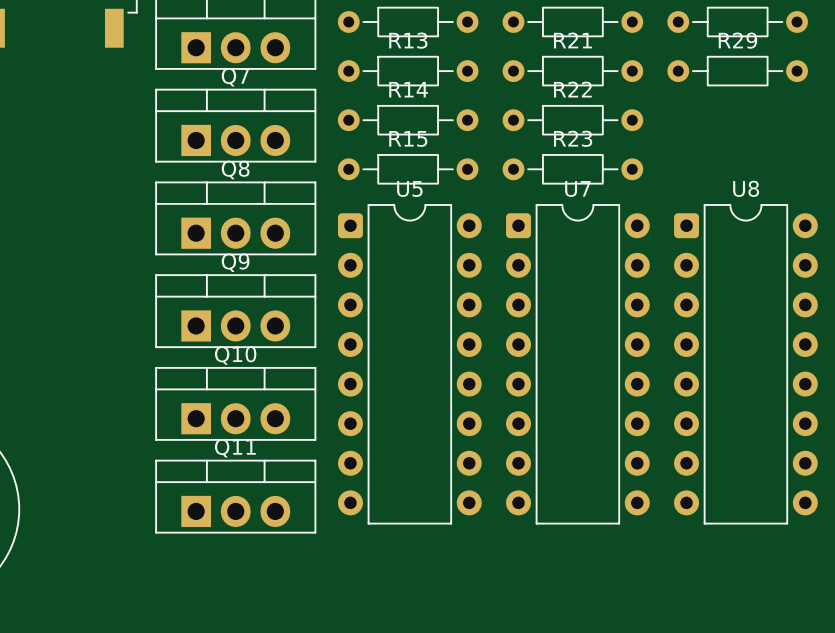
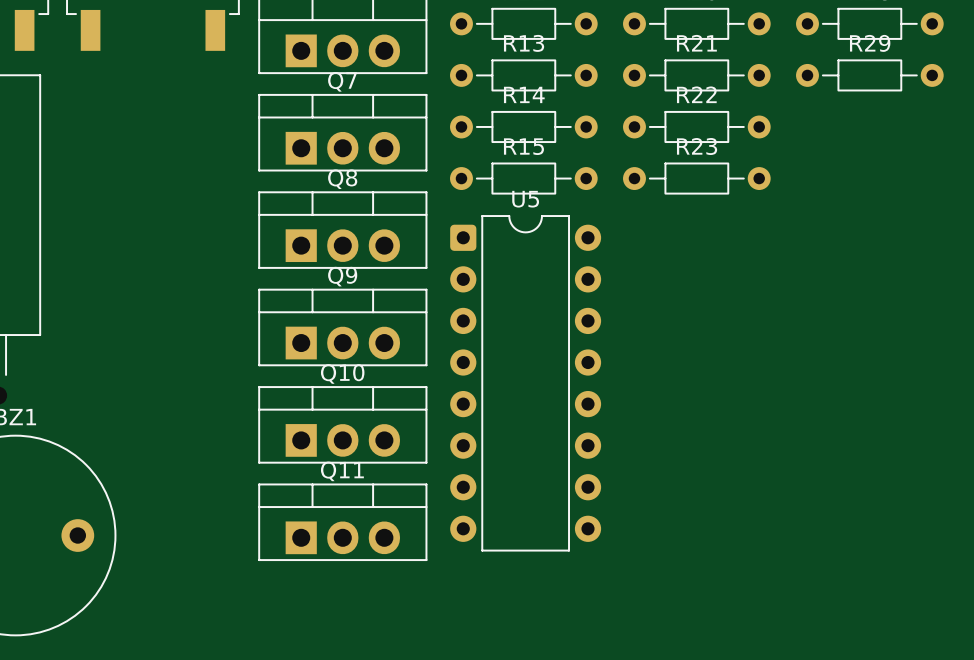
U7: (577, 364) -> none
U8: (745, 364) -> none

